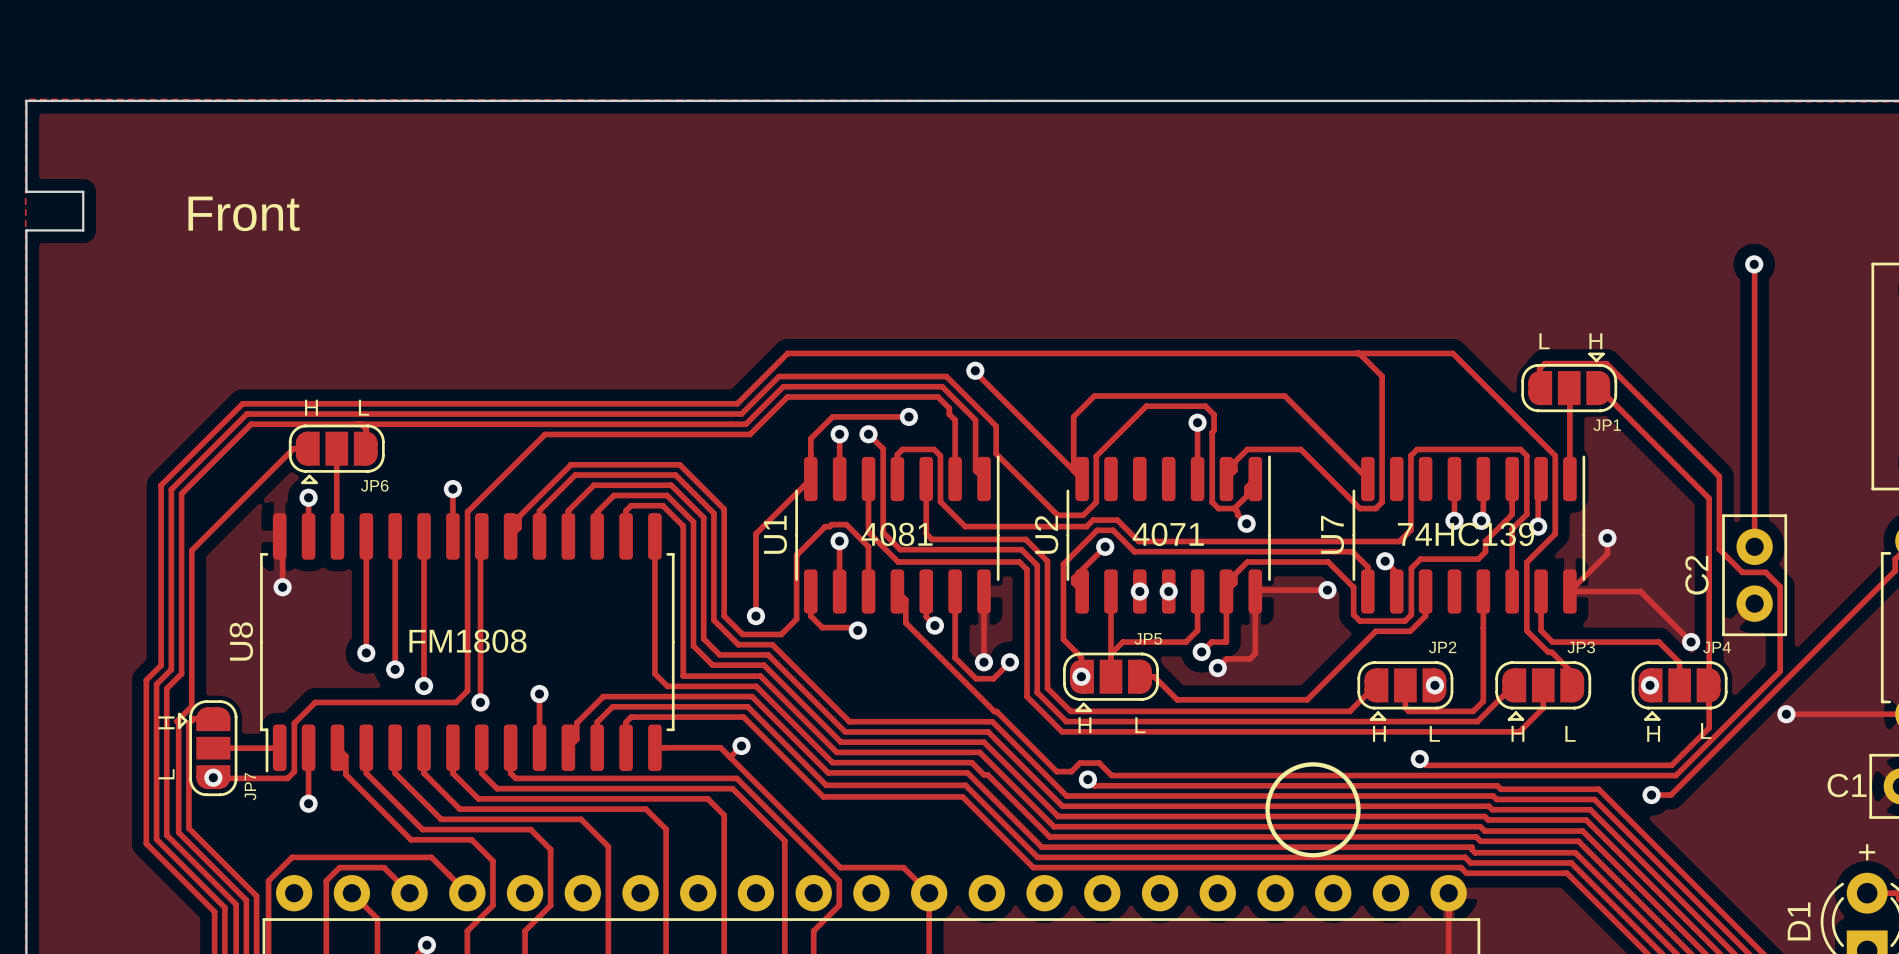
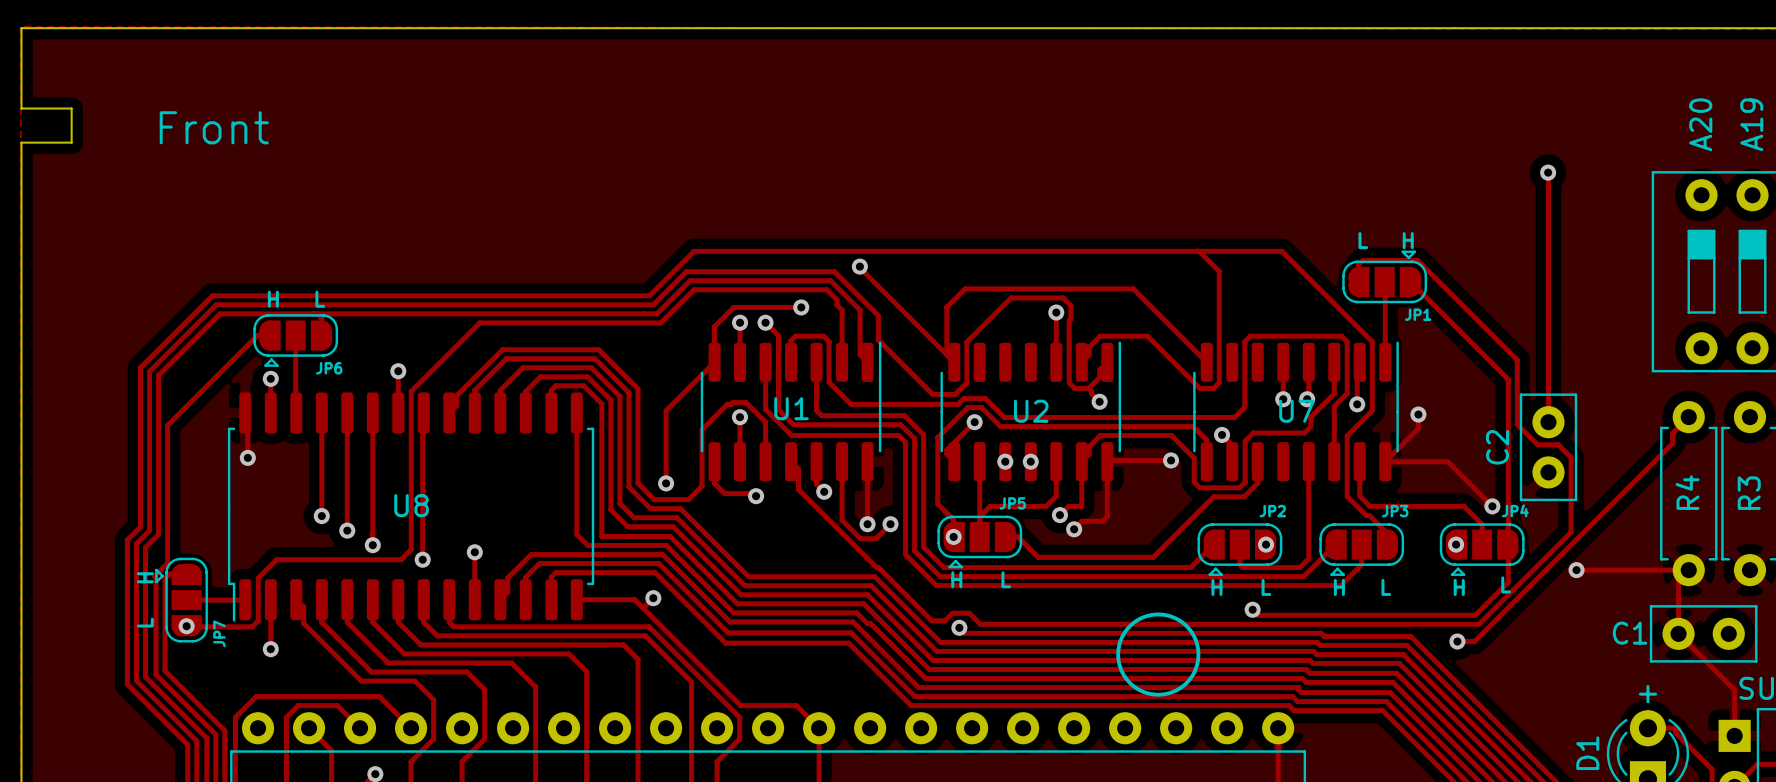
U1 name rotation: 0° (775, 534) -> 90° clockwise (791, 408)
U1 name position: U1 (775, 534) -> U1 (791, 408)
text: 4081 (896, 534) -> none
U2 name rotation: 0° (1046, 534) -> 90° clockwise (1031, 411)
U2 name position: U2 (1046, 534) -> U2 (1031, 411)
text: 4071 (1168, 534) -> none
U7 name rotation: 0° (1332, 534) -> 90° clockwise (1296, 411)
U7 name position: U7 (1332, 534) -> U7 (1296, 411)
text: 74HC139 (1466, 534) -> none
U8 name rotation: 0° (241, 641) -> 90° clockwise (411, 505)
U8 name position: U8 (241, 641) -> U8 (411, 505)
text: FM1808 (467, 641) -> none

